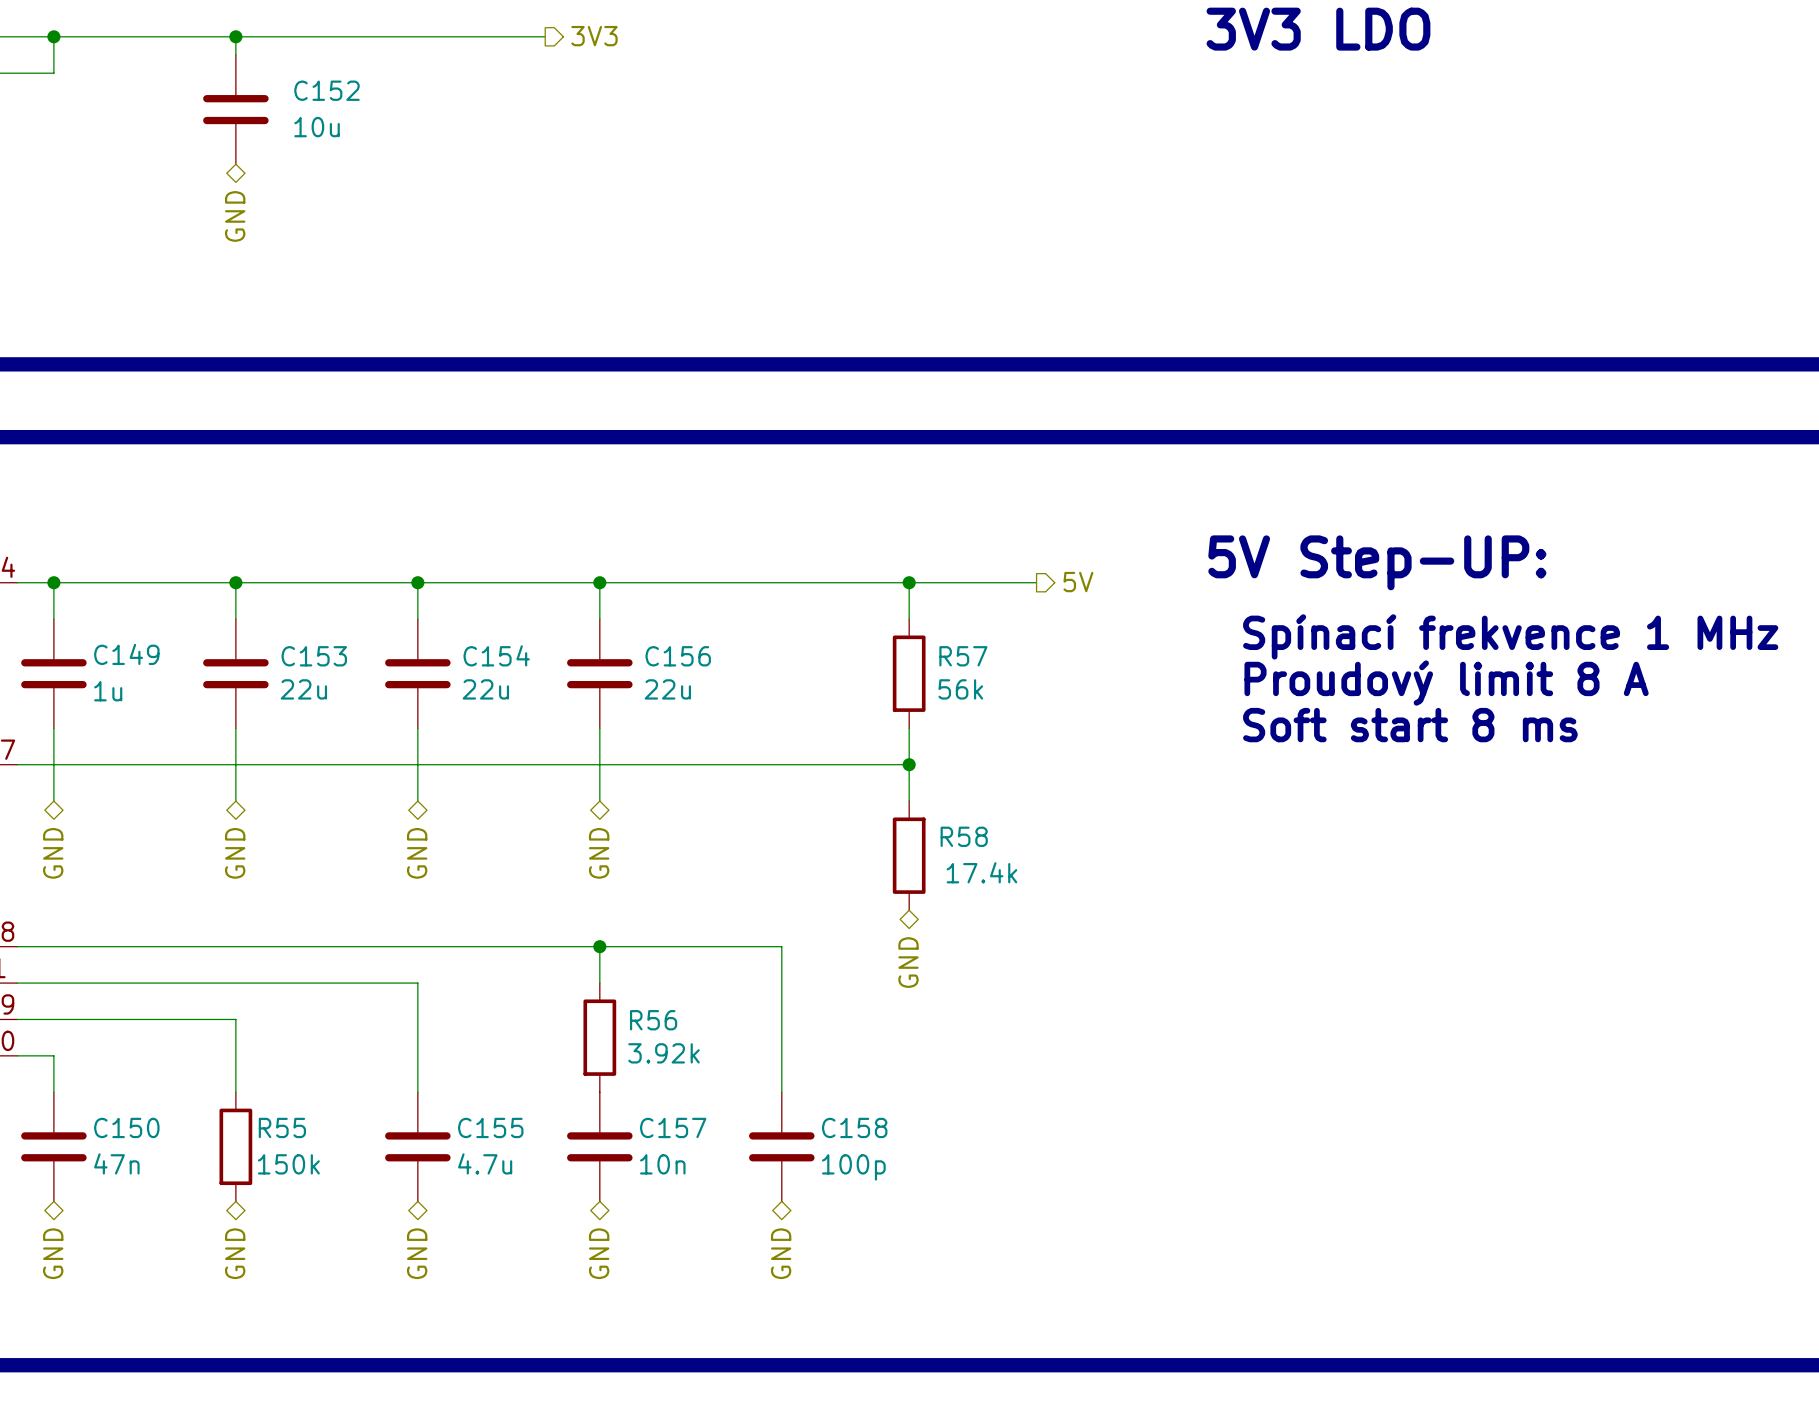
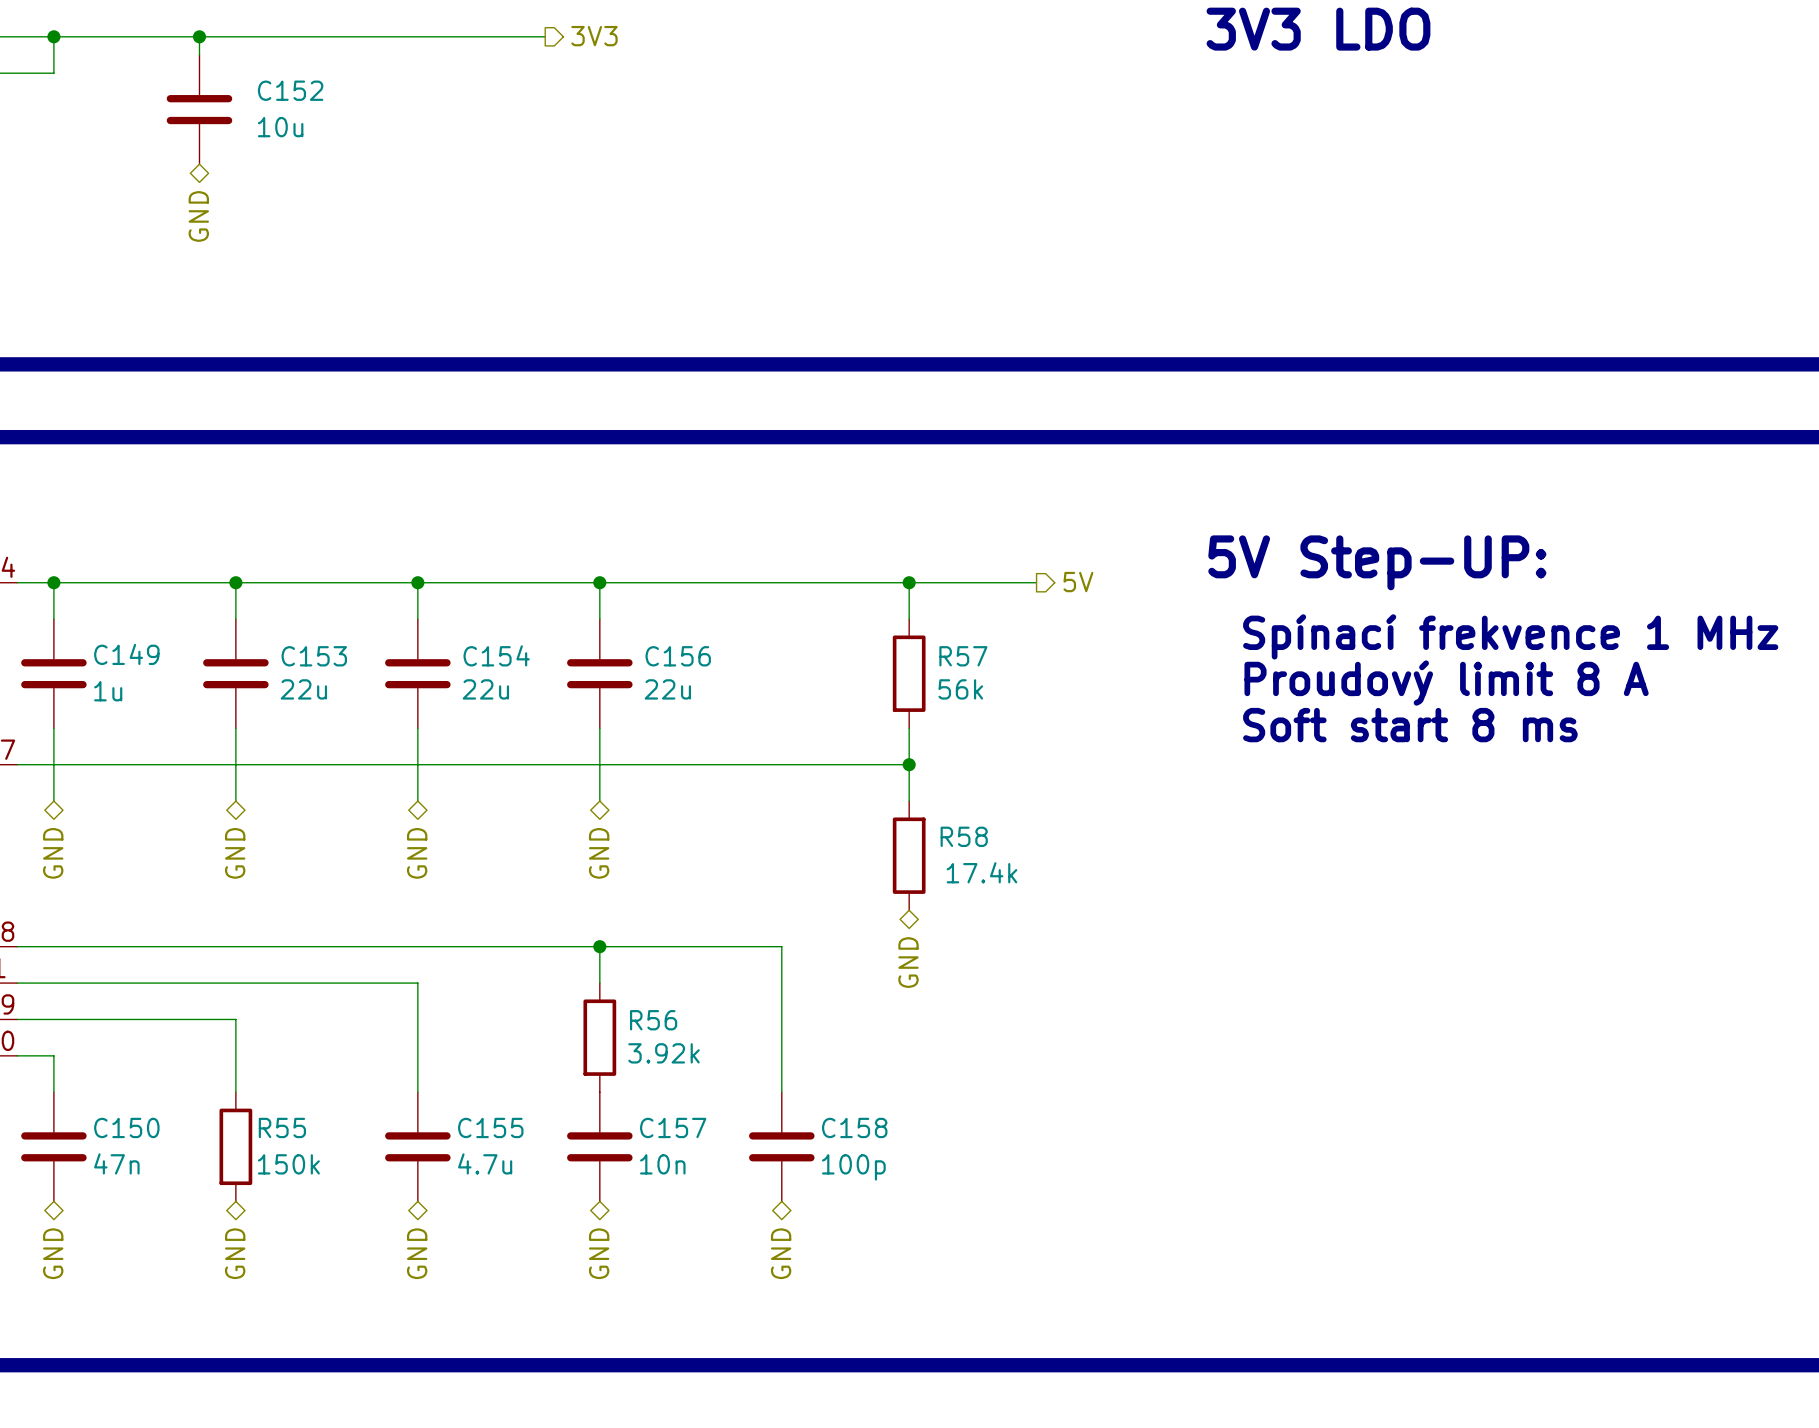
wire: (235, 36) (235, 55) -> (199, 36) (199, 55)
junction position: (235, 36) -> (199, 36)
C152 position: (235, 109) -> (199, 109)
hierarchical label position: GND (235, 216) -> GND (198, 216)

